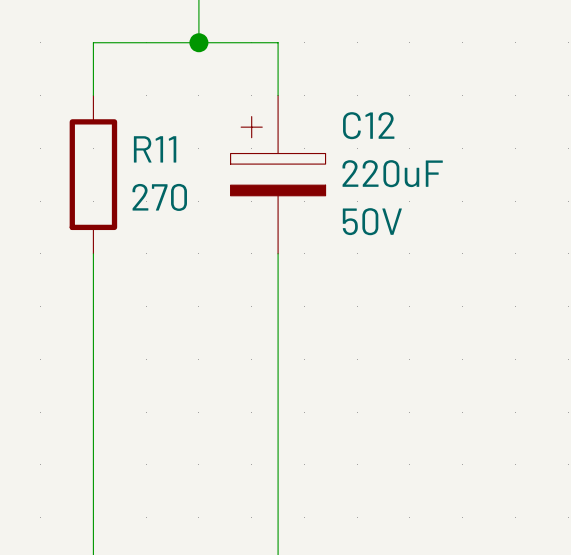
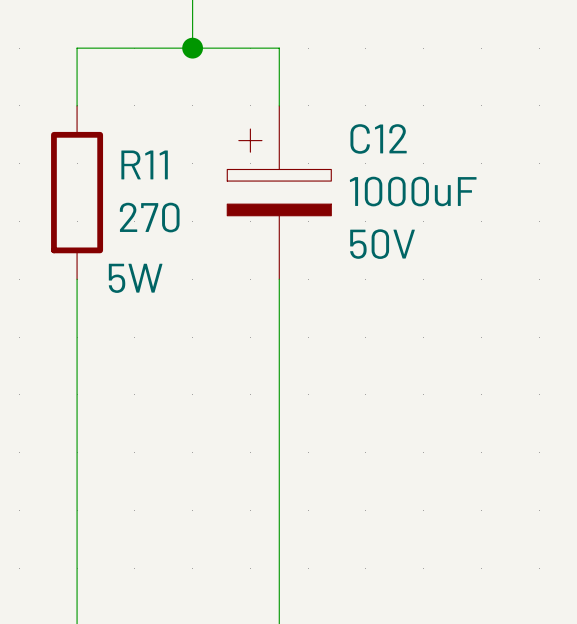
C12 value: 220uF (392, 173) -> 1000uF (413, 191)
R11 text: none -> 5W (135, 278)

